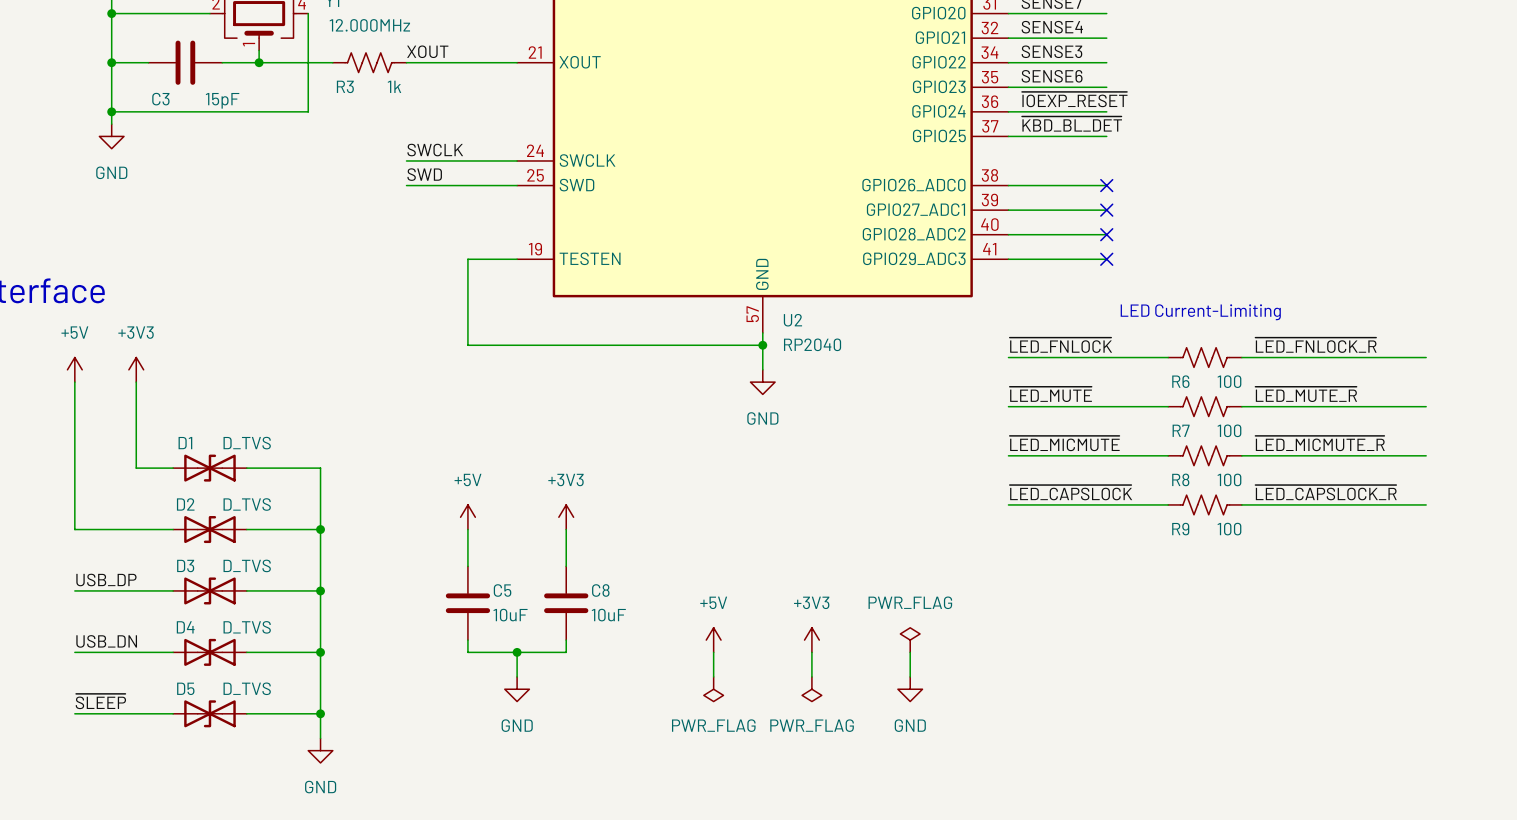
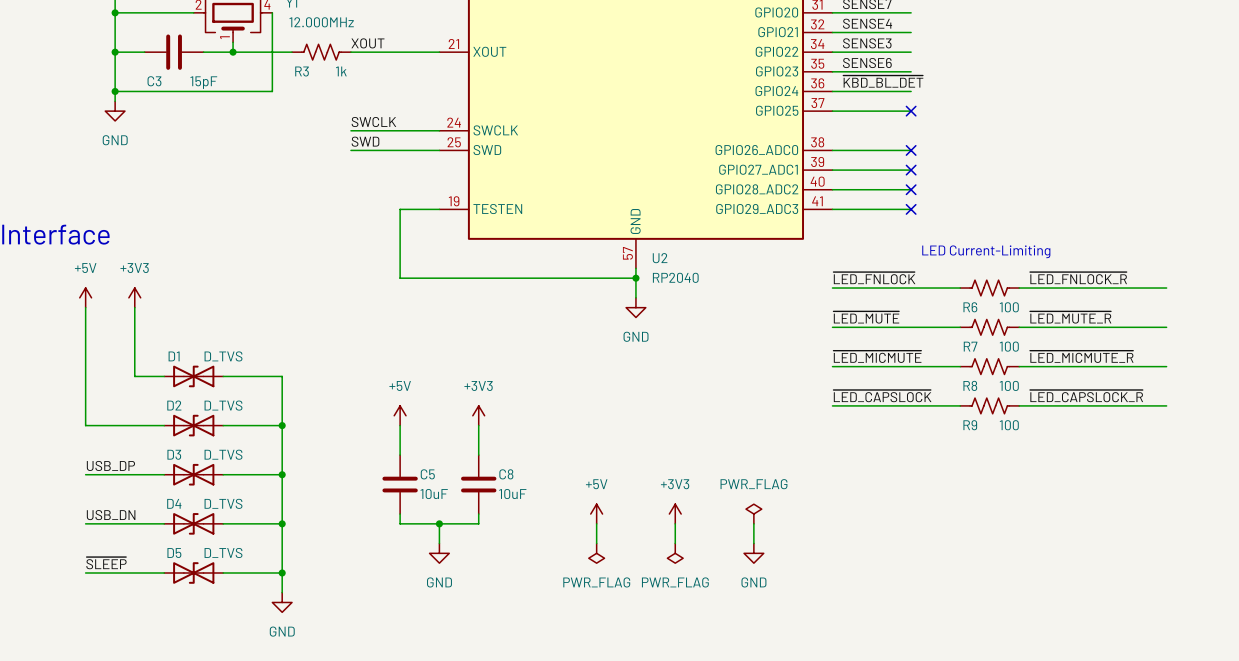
label: ~{IOEXP_RESET} (1074, 99) -> ~{KBD_BL_DET} (883, 81)
label: ~{KBD_BL_DET} (1071, 124) -> none
no-connect mark: none -> (911, 111)

